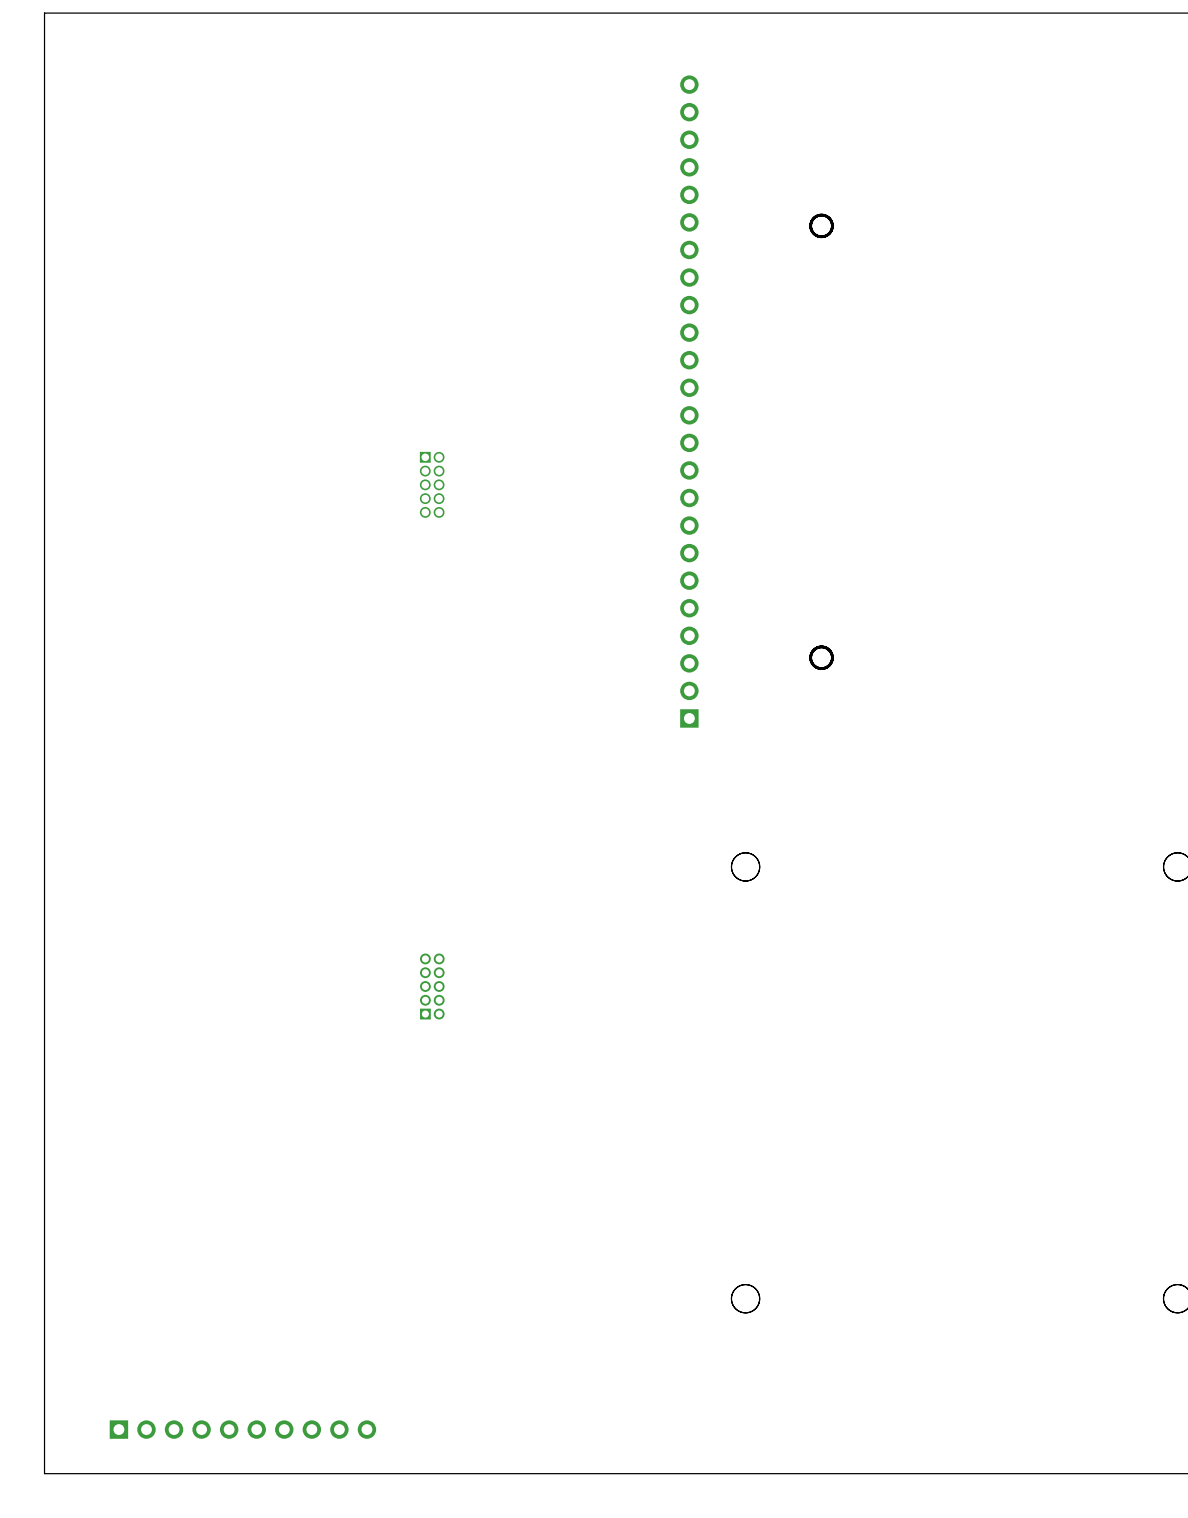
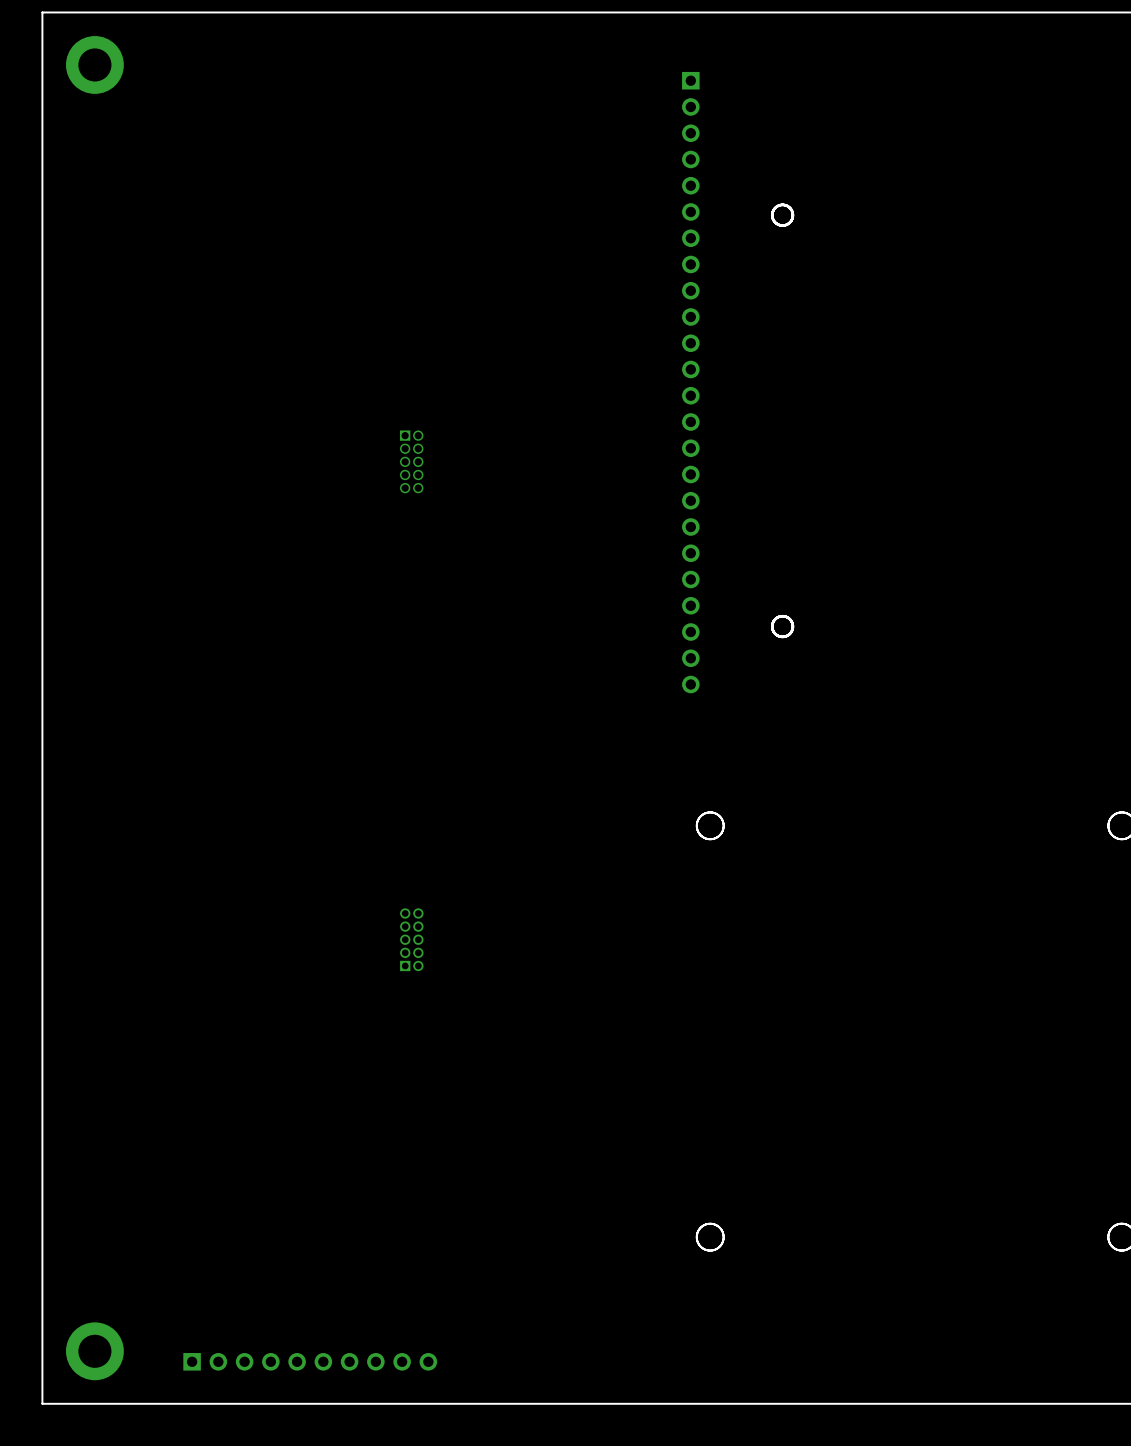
part: none -> (94, 64)
part rotation: 0° (689, 401) -> 180° (690, 382)
part: none -> (94, 1351)
part position: (242, 1429) -> (310, 1361)

